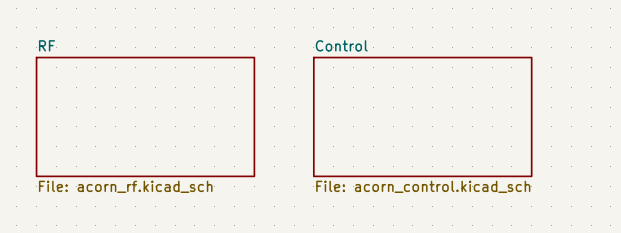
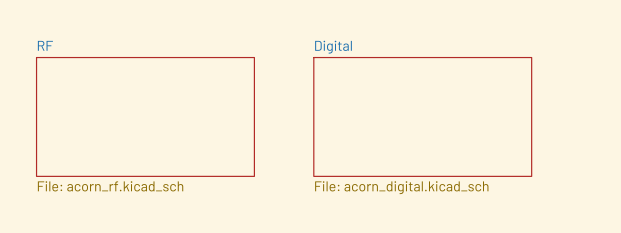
sheet Control name: Control (341, 45) -> Digital (333, 47)
sheet Control value: File: acorn_control.kicad_sch (423, 186) -> File: acorn_digital.kicad_sch (401, 187)

